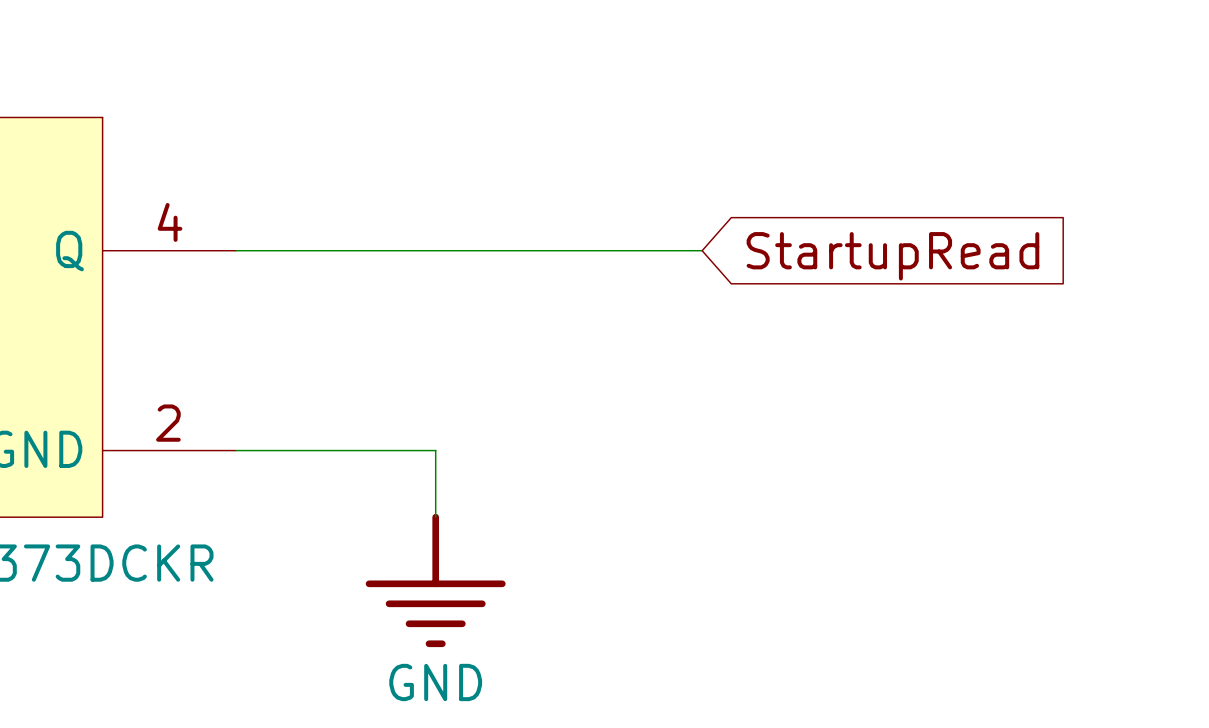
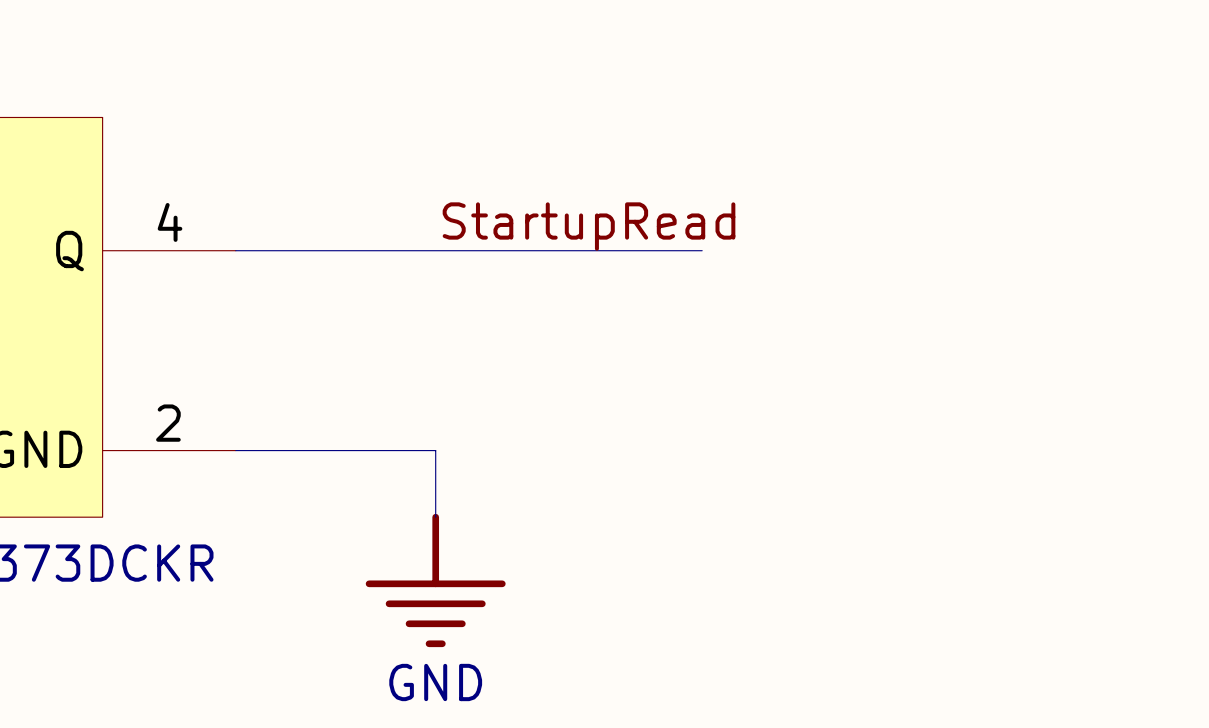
label: none -> StartupRead (589, 226)
global label: StartupRead (892, 256) -> none

